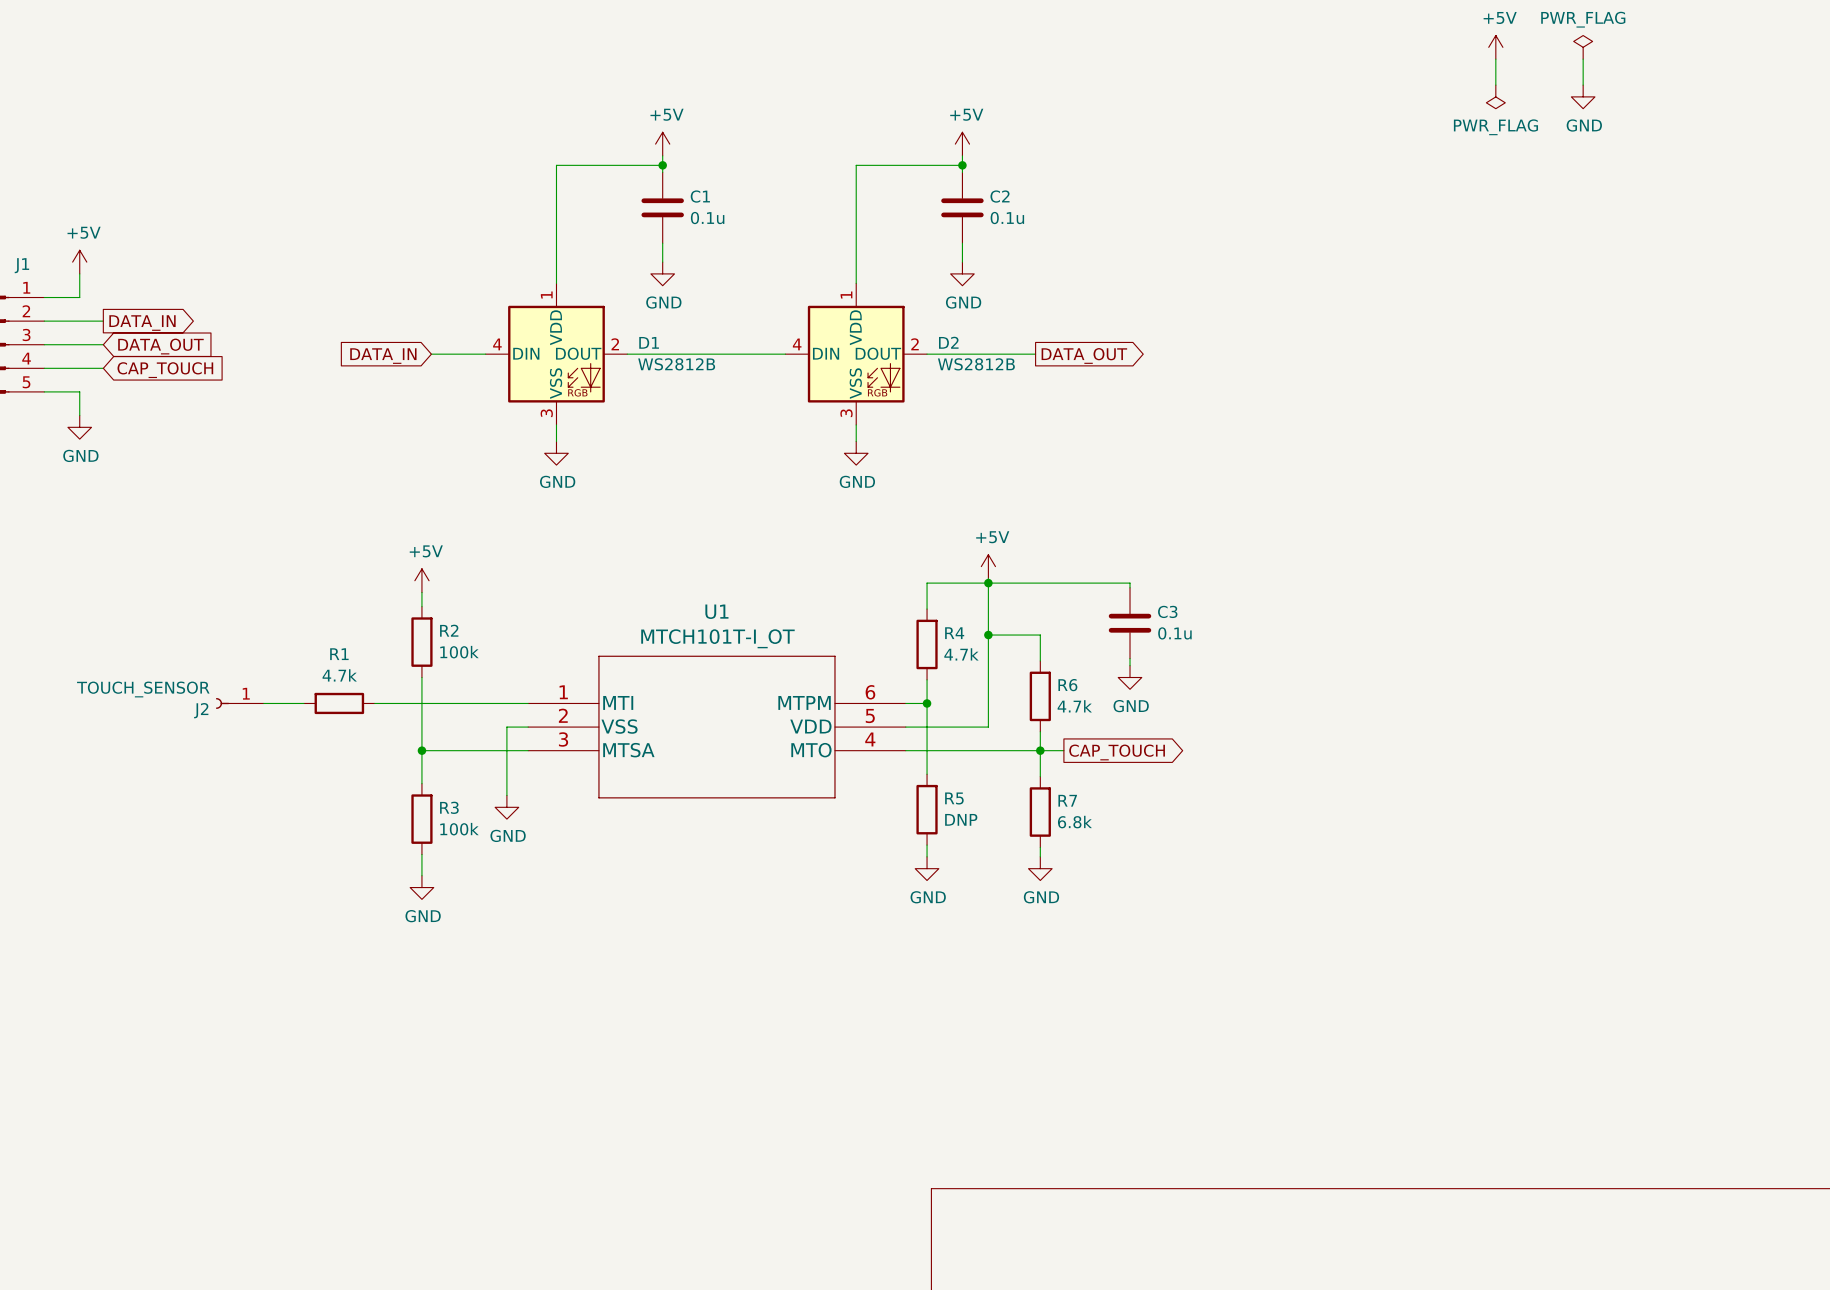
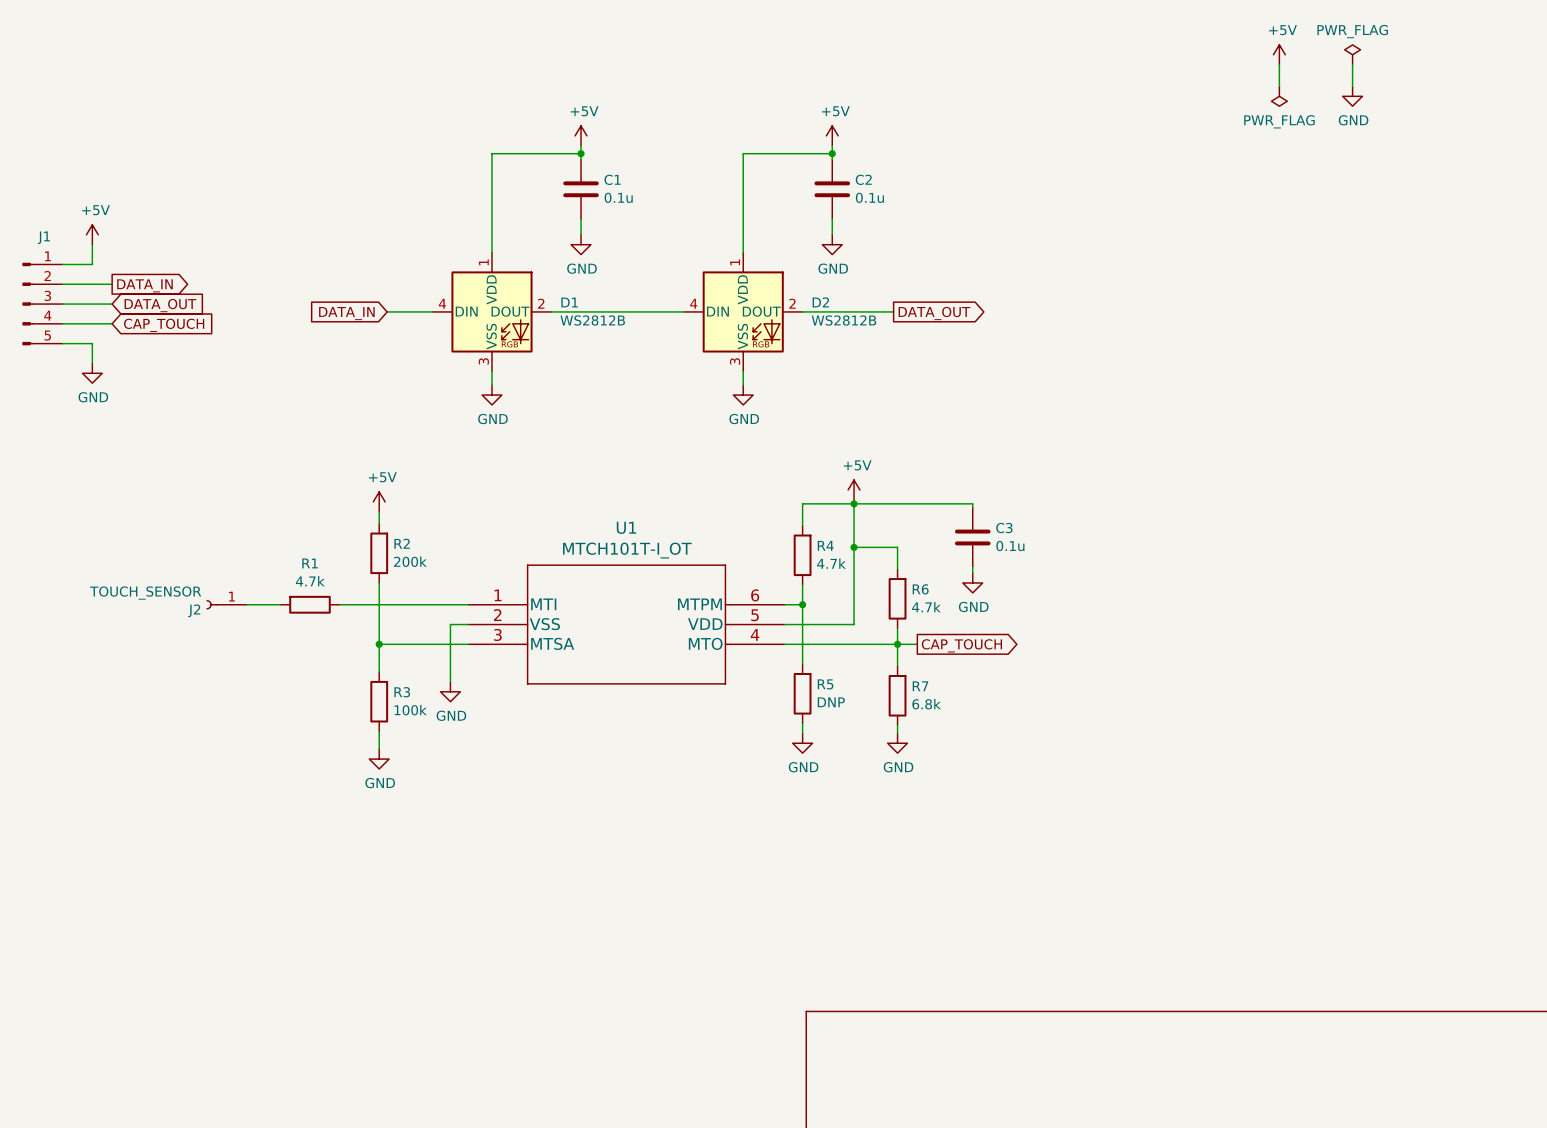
R2 value: 100k (459, 652) -> 200k (410, 561)

